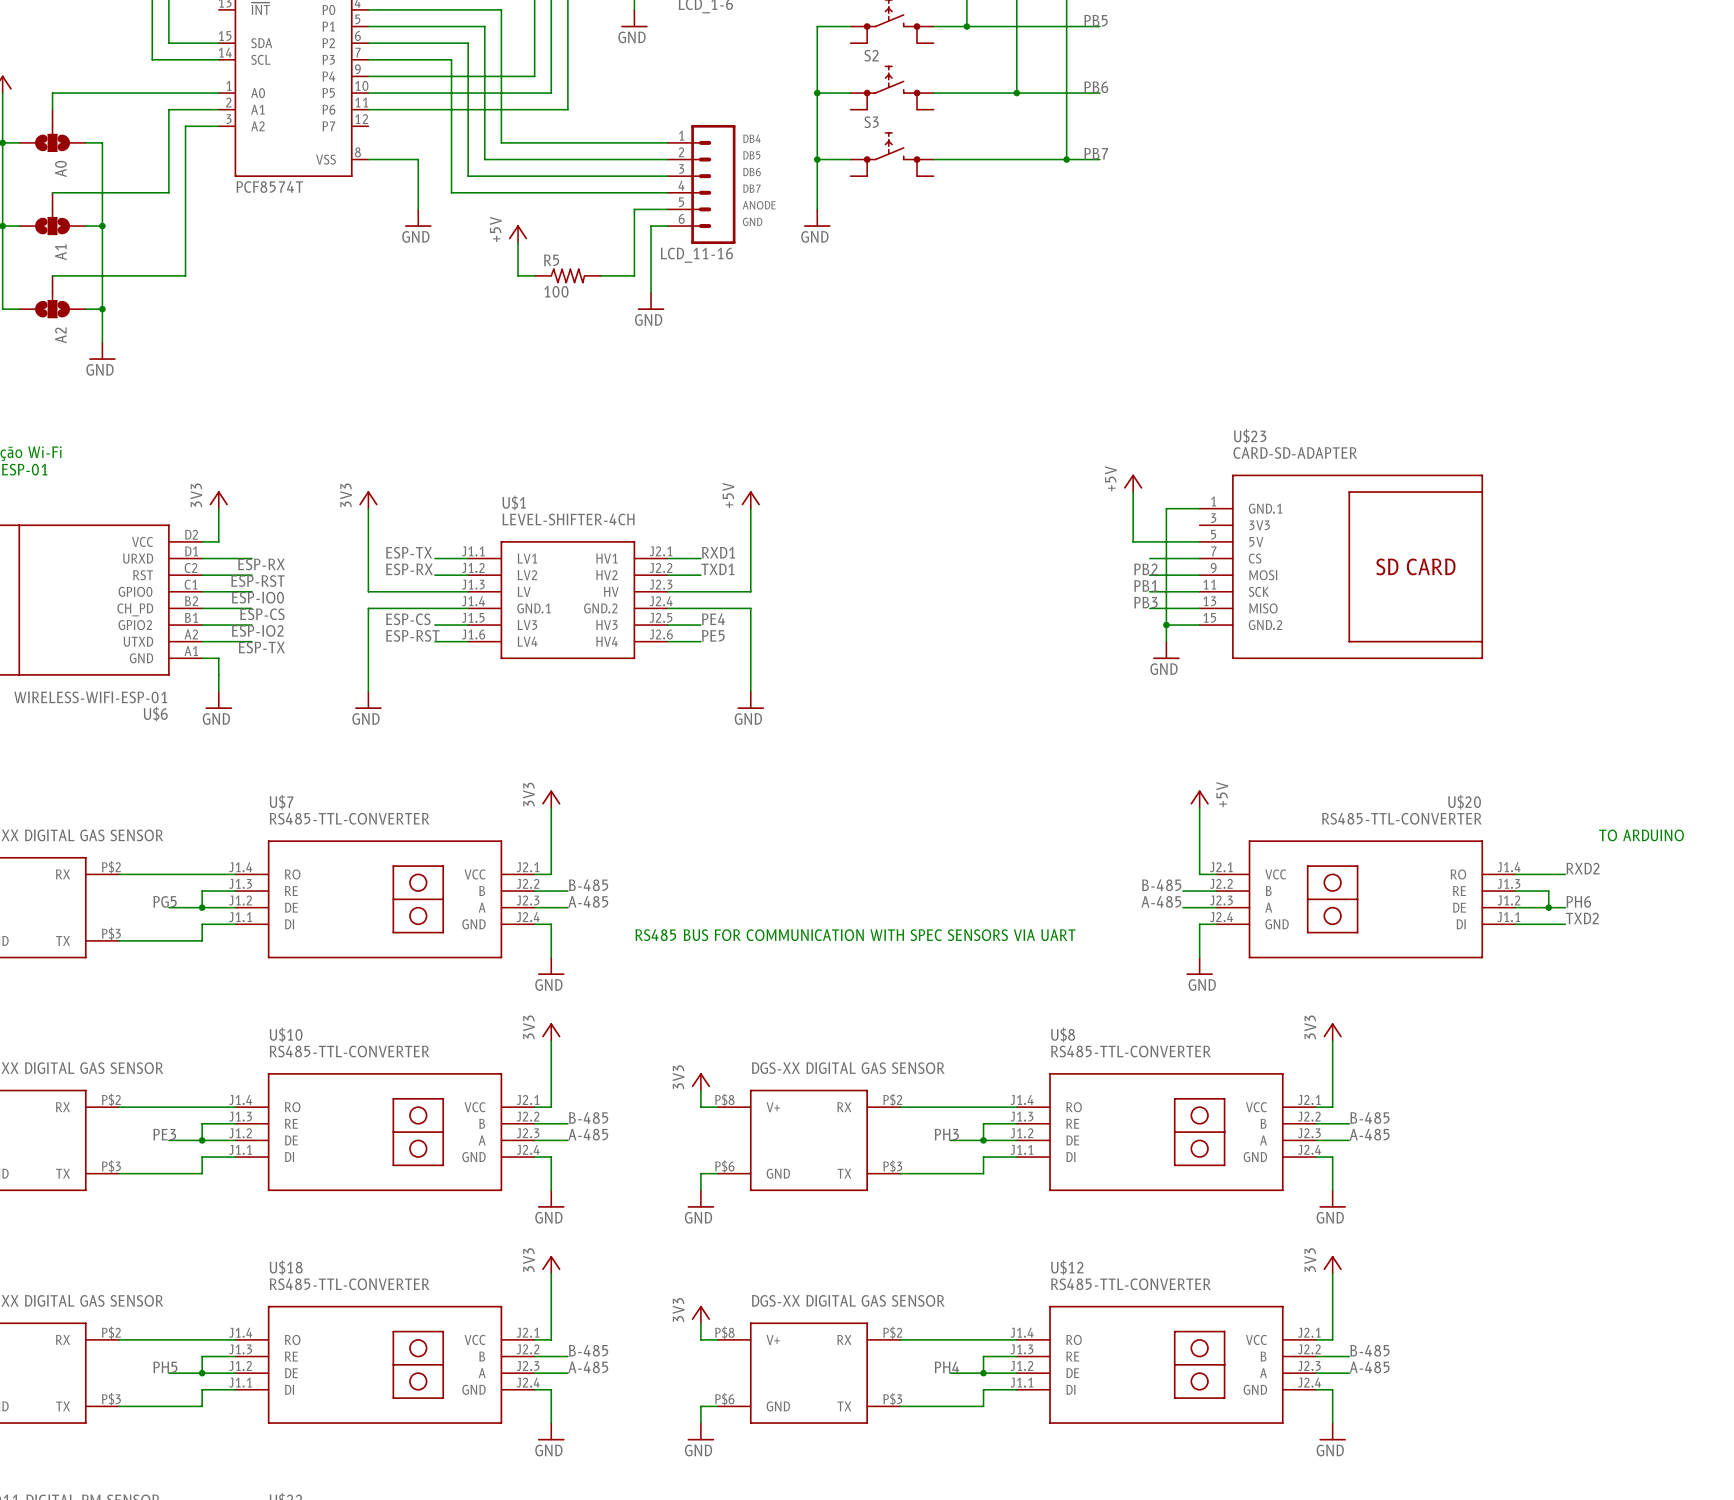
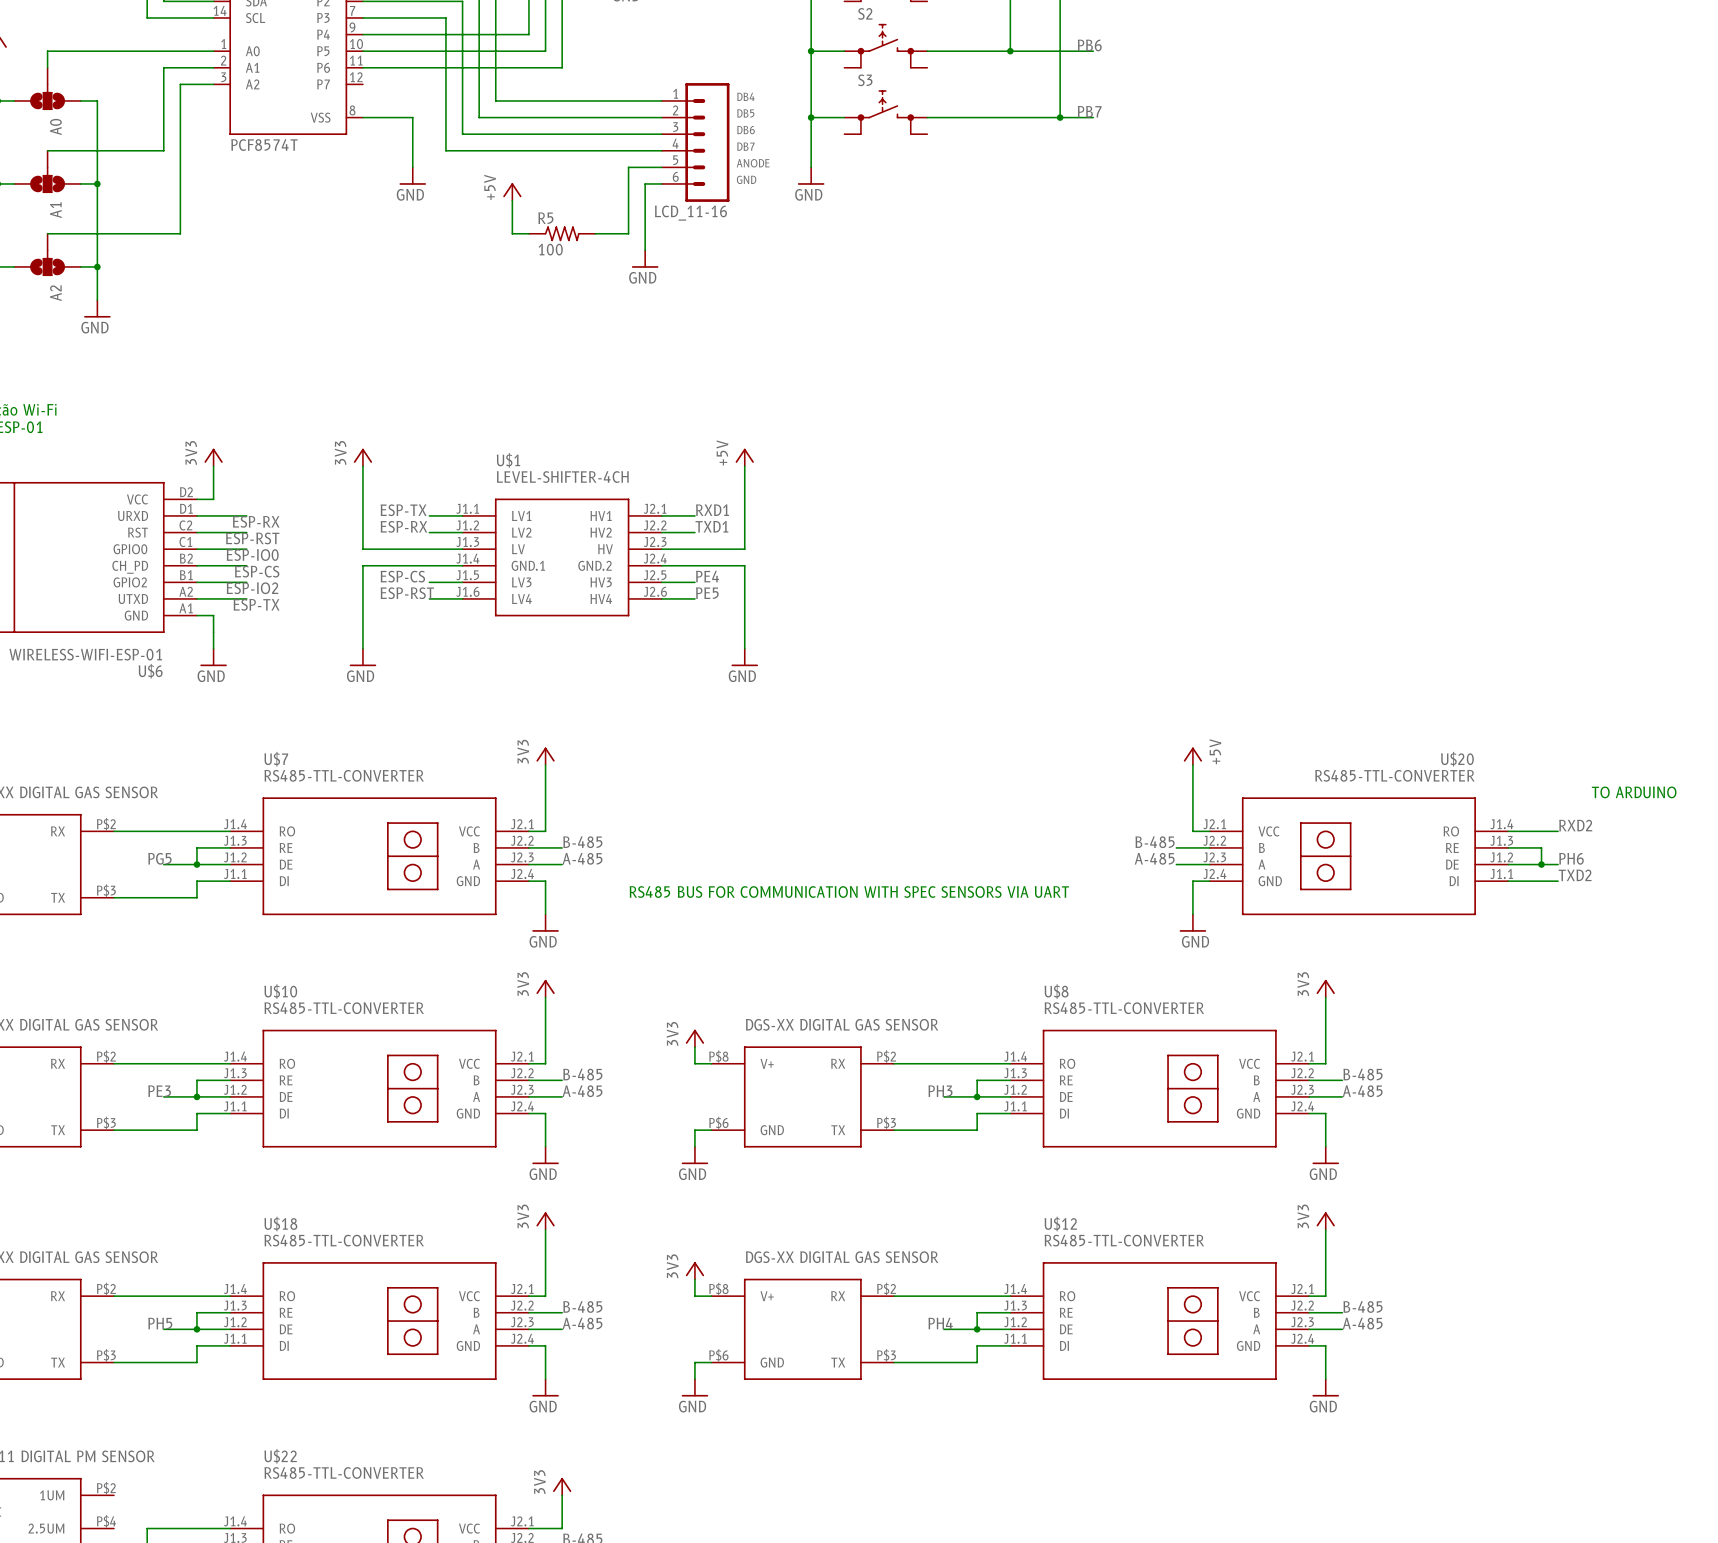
power symbol: +5V (1133, 483) -> none
wire: (1133, 492) (1133, 541) (1199, 541) -> none
wire: (1199, 508) (1166, 508) (1166, 641) -> none
wire: (1149, 558) (1199, 558) -> none
U$23: CARD-SD-ADAPTER (1341, 566) -> none
label: PB2 (1145, 569) -> none
wire: (1149, 575) (1199, 575) -> none
label: PB1 (1145, 585) -> none
wire: (1149, 591) (1199, 591) -> none
label: PB3 (1145, 602) -> none
wire: (1149, 608) (1199, 608) -> none
wire: (1166, 625) (1199, 625) -> none
junction: (1166, 625) -> none
power symbol: GND (1166, 650) -> none

